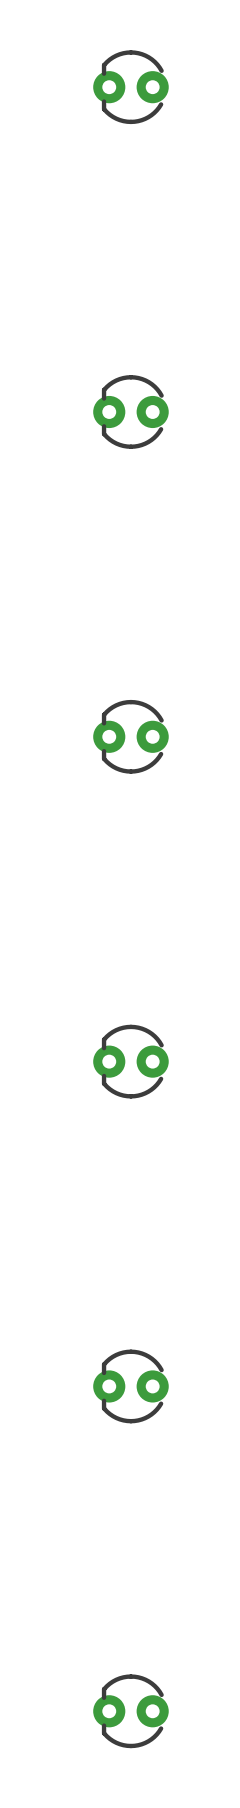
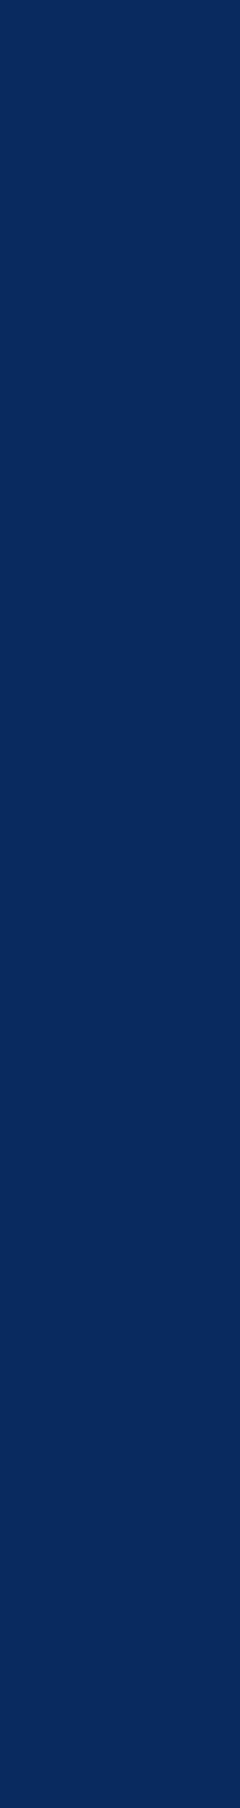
part: (130, 87) -> none
part: (130, 411) -> none
part: (130, 736) -> none
part: (130, 1061) -> none
part: (130, 1386) -> none
part: (130, 1711) -> none

